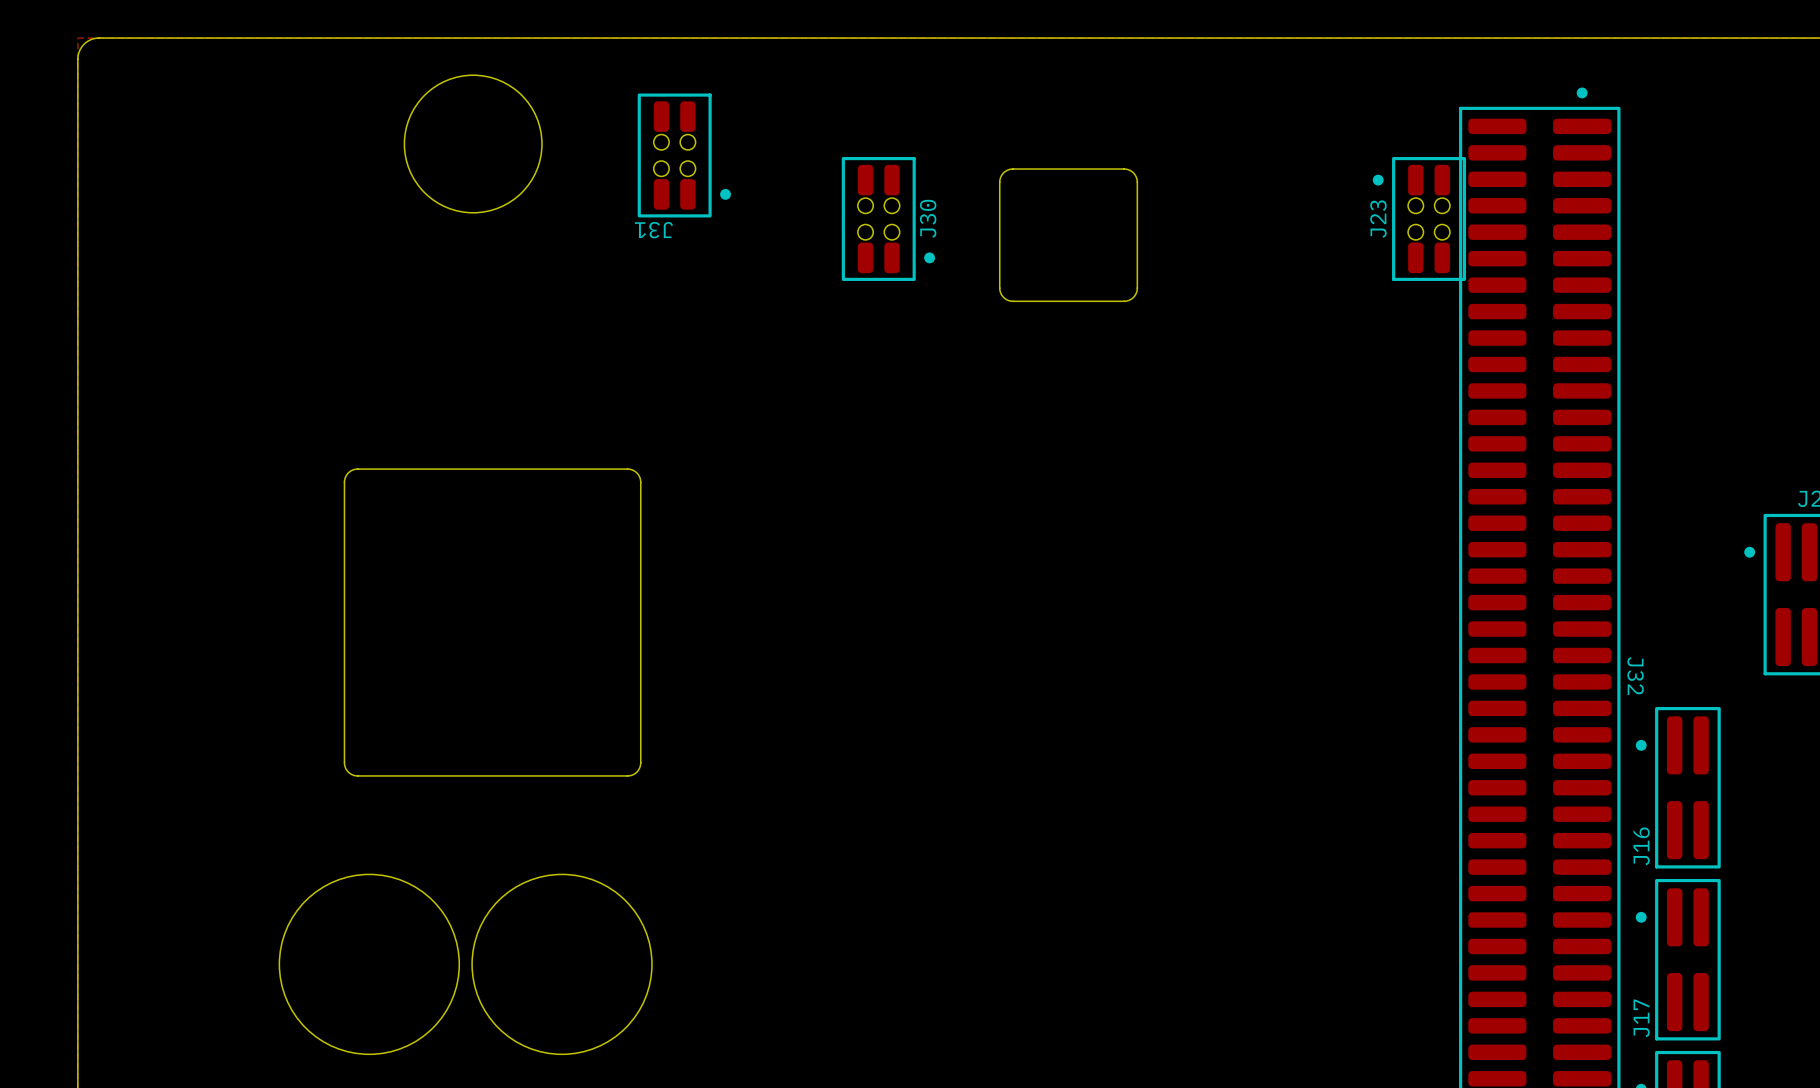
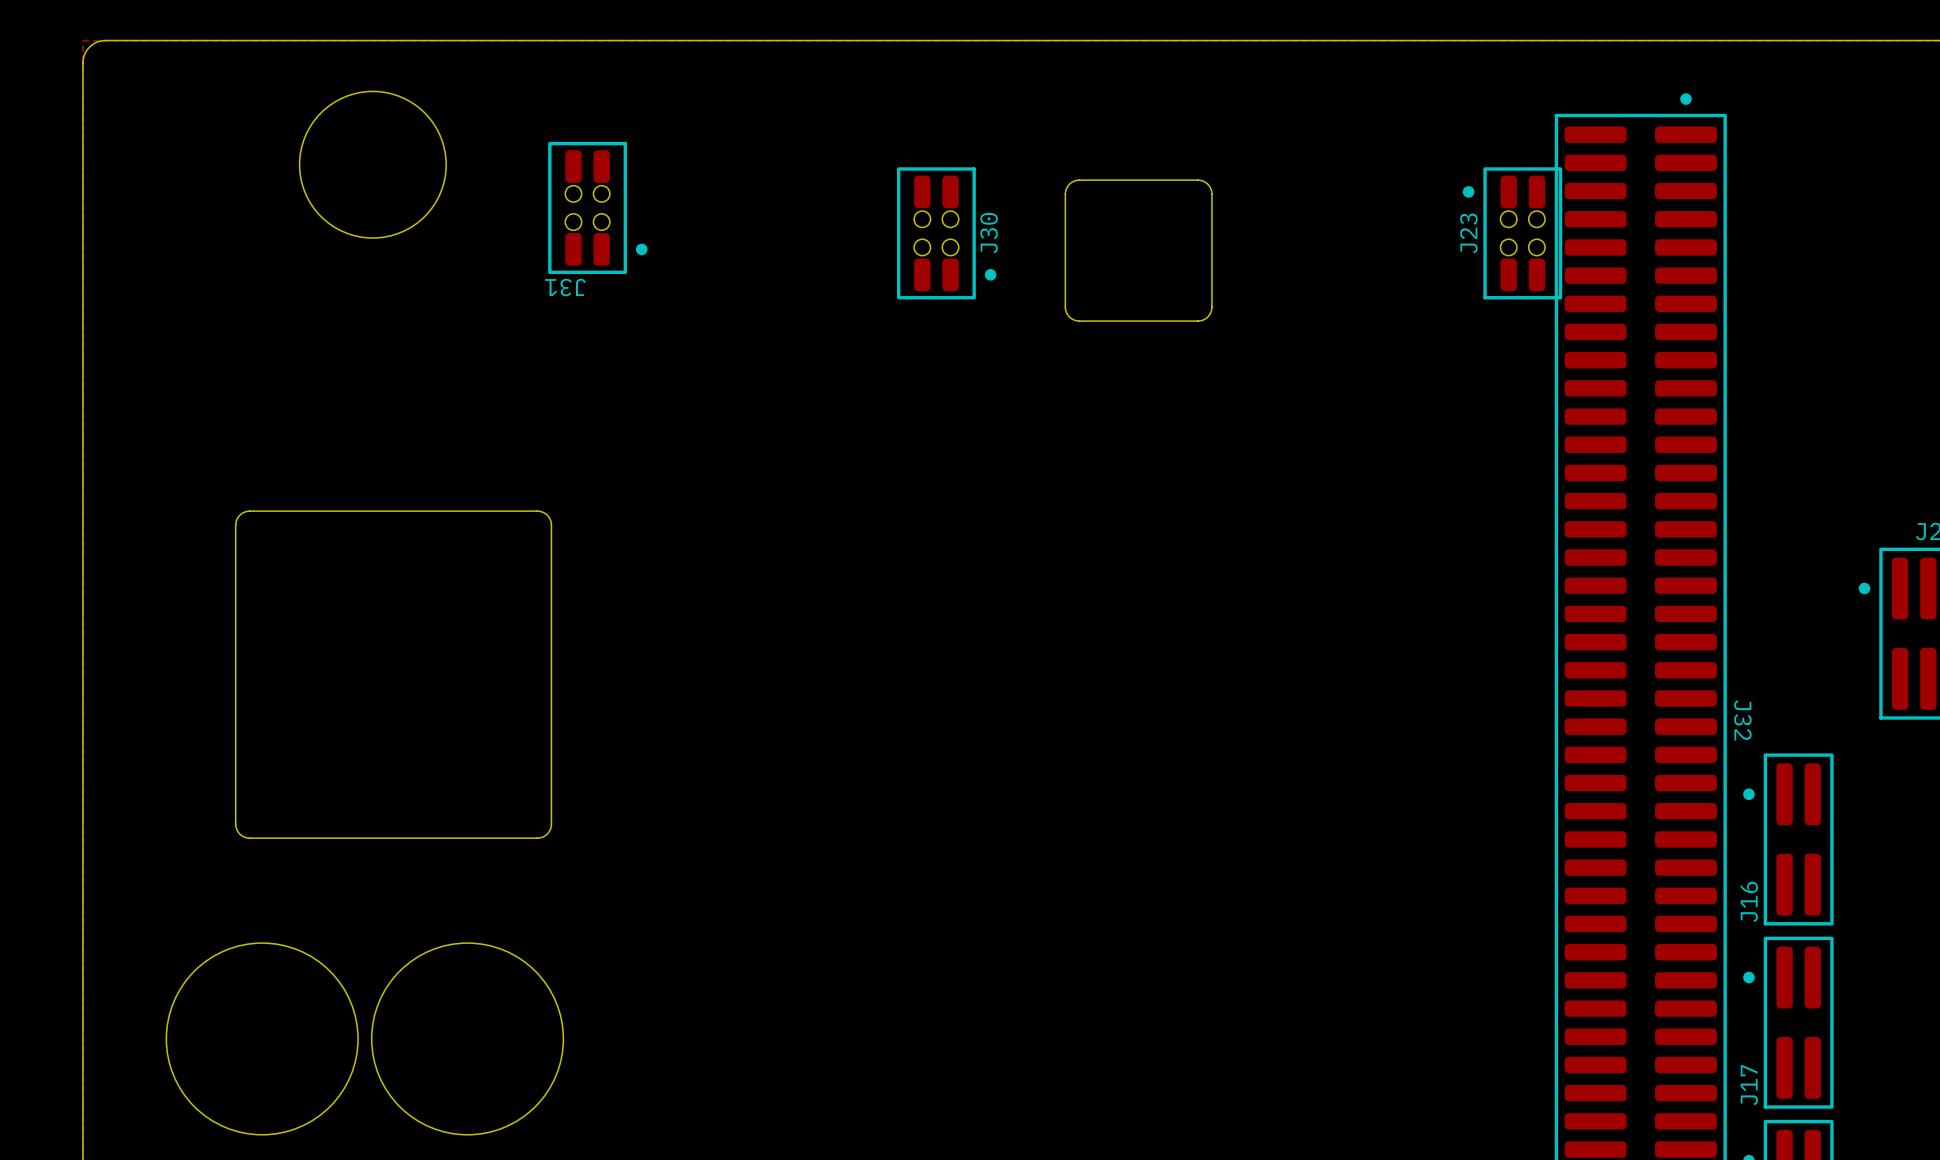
J31 position: (684, 155) -> (597, 207)
drawing position: (465, 564) -> (364, 613)

